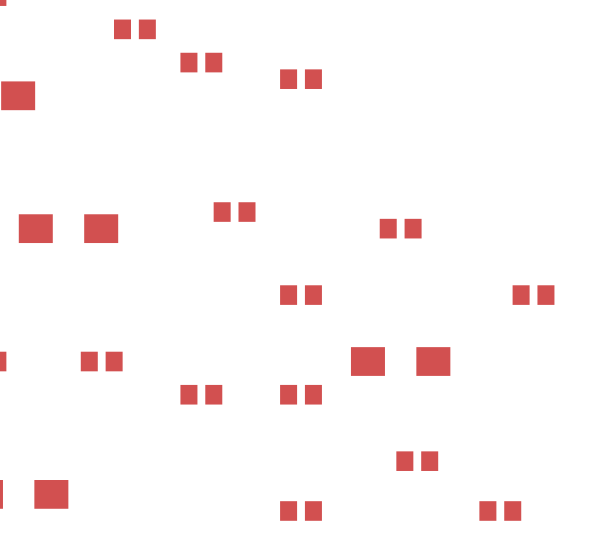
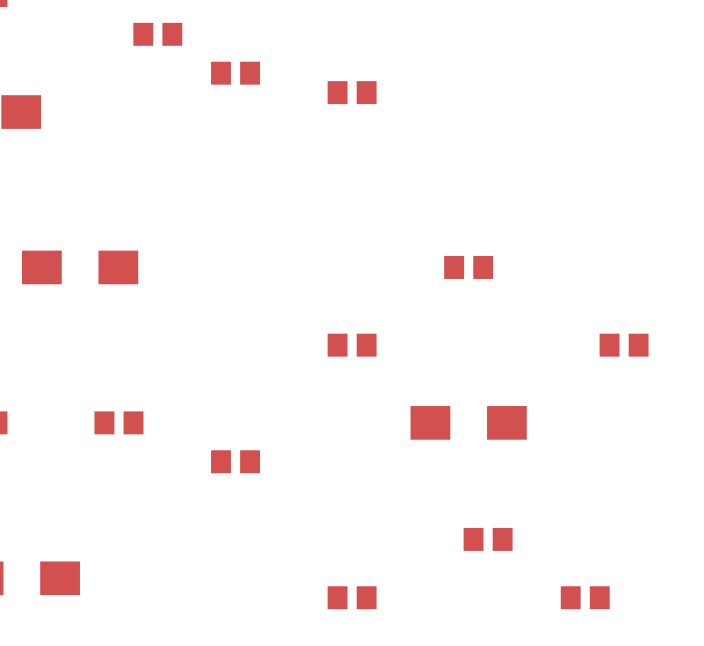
part: (234, 212) -> none
part: (301, 394) -> none

